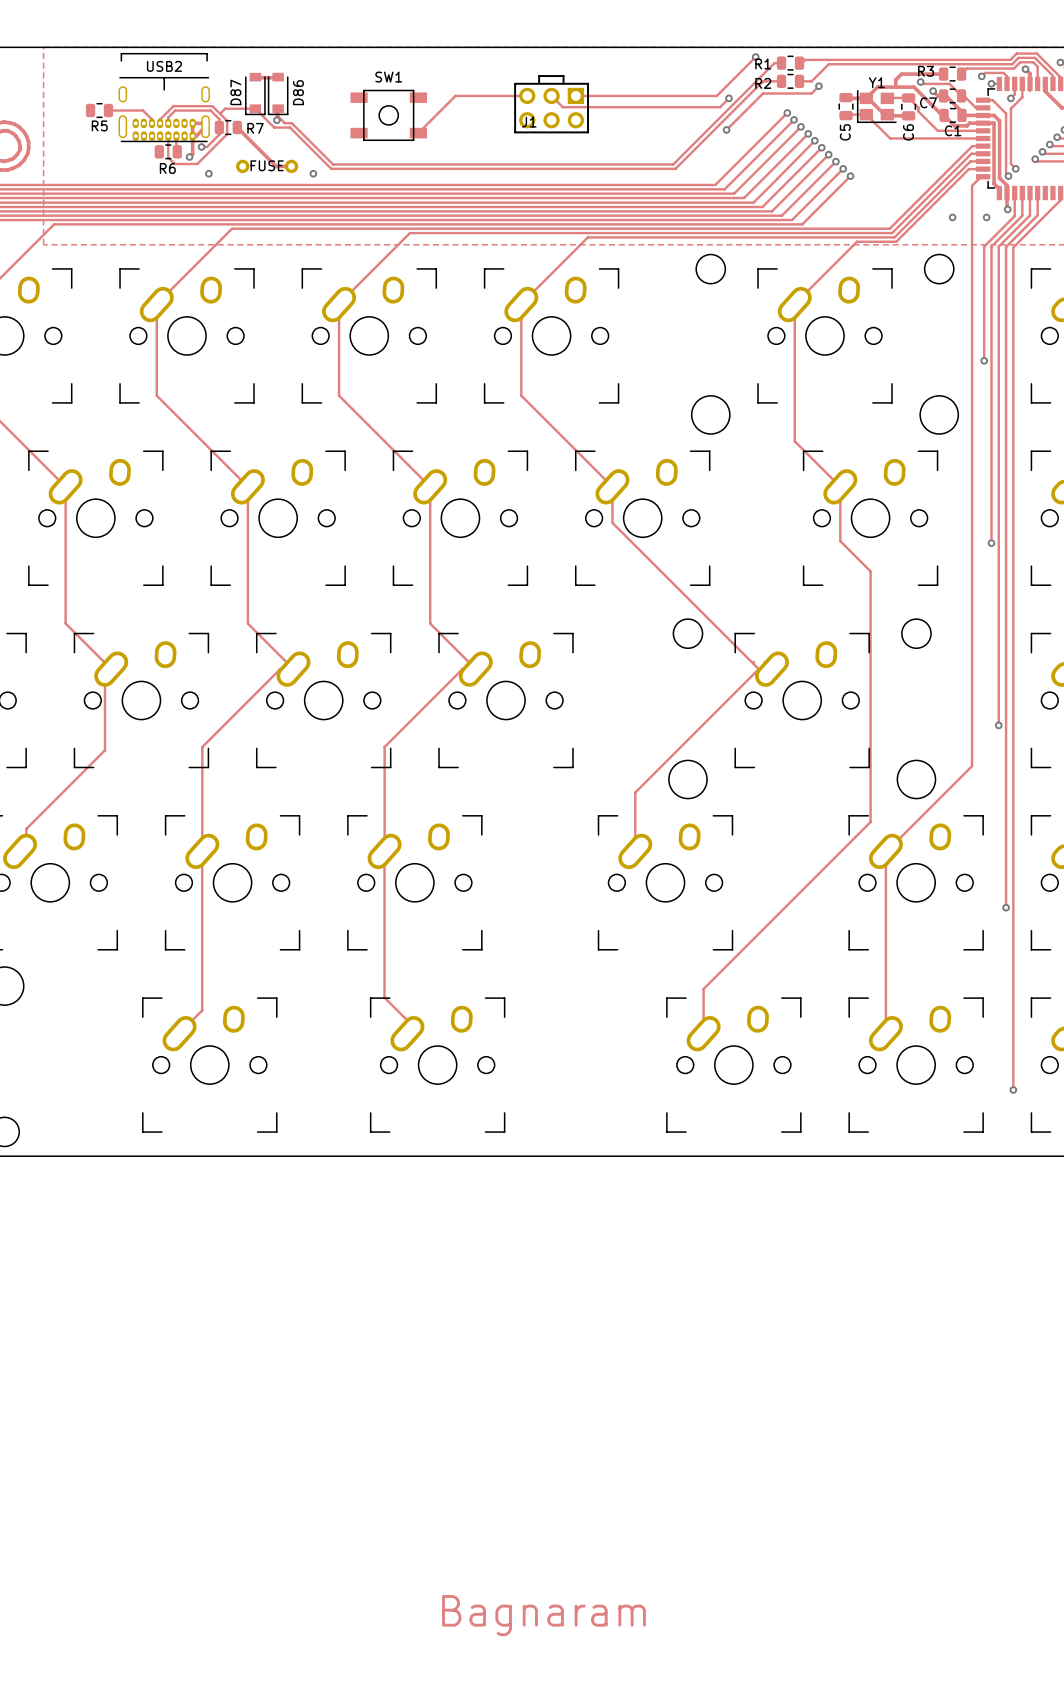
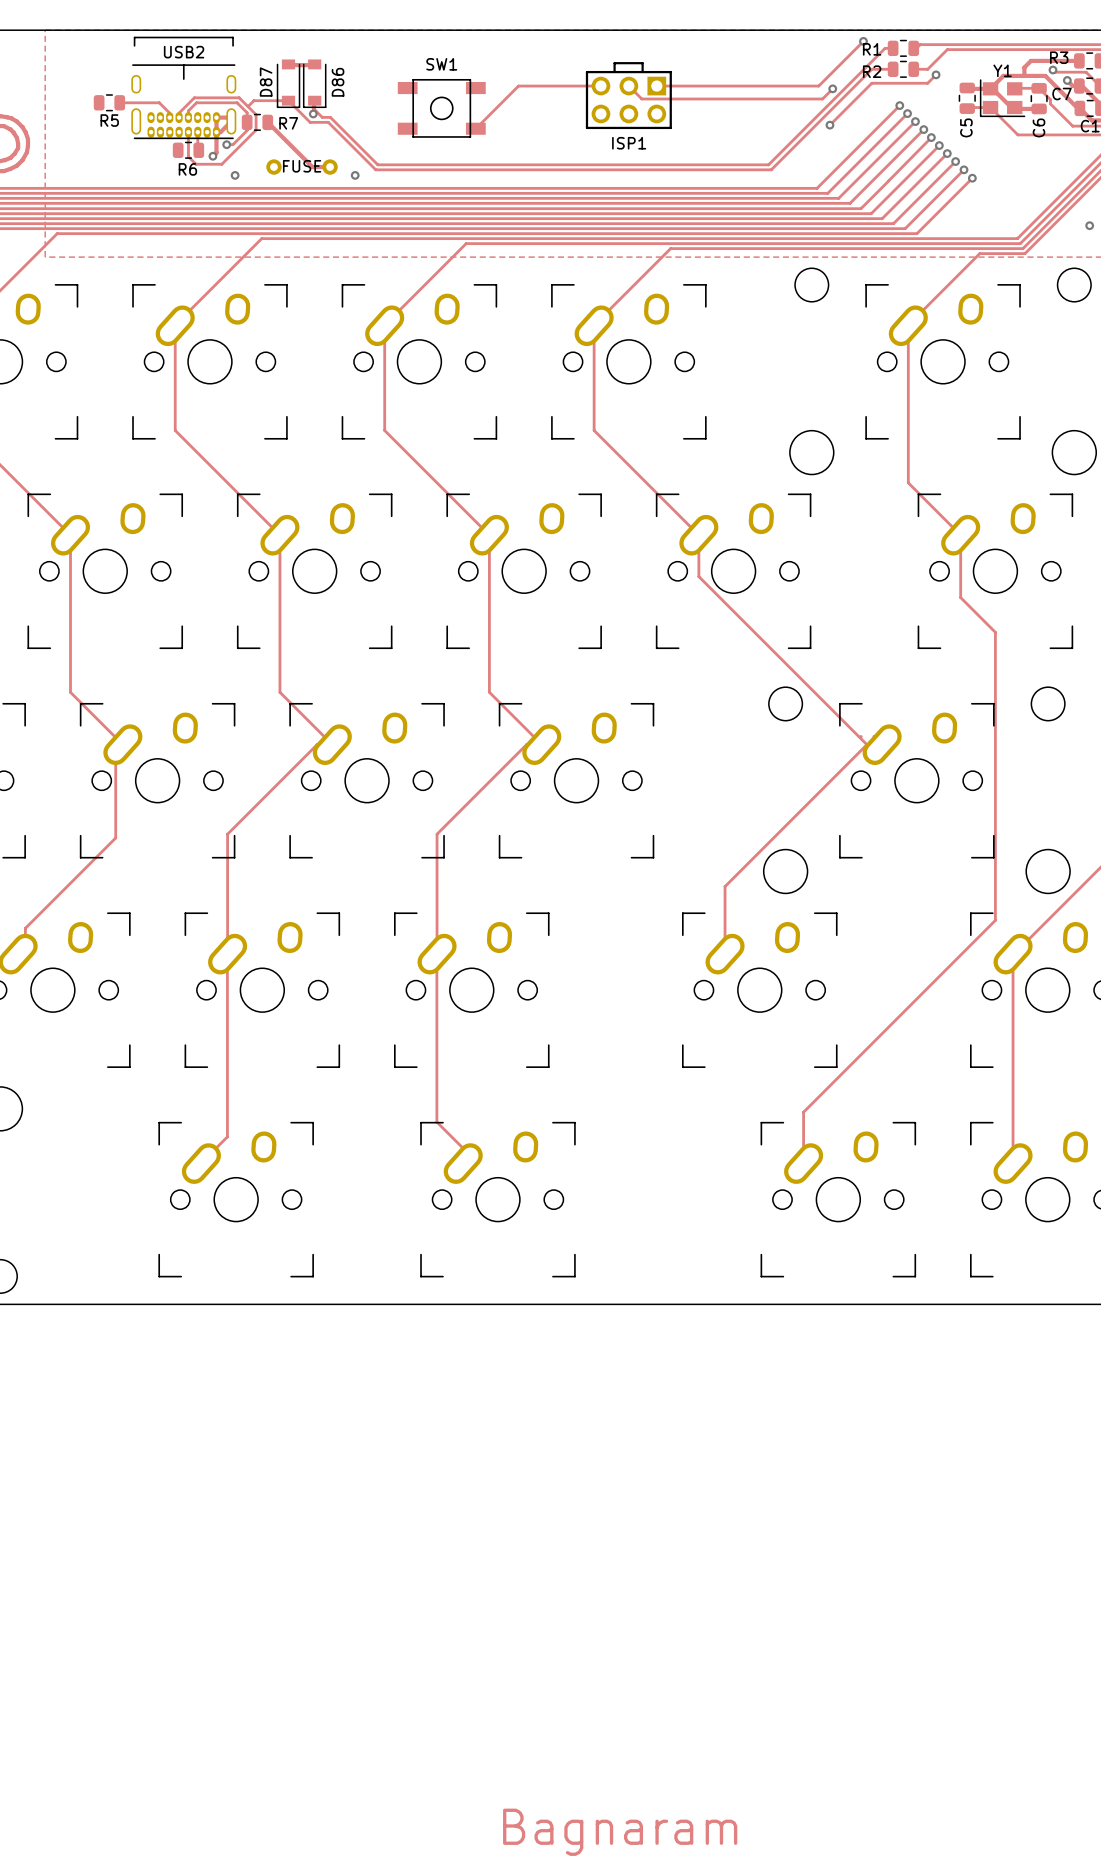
J1 name: J1 (529, 122) -> ISP1 (629, 143)

